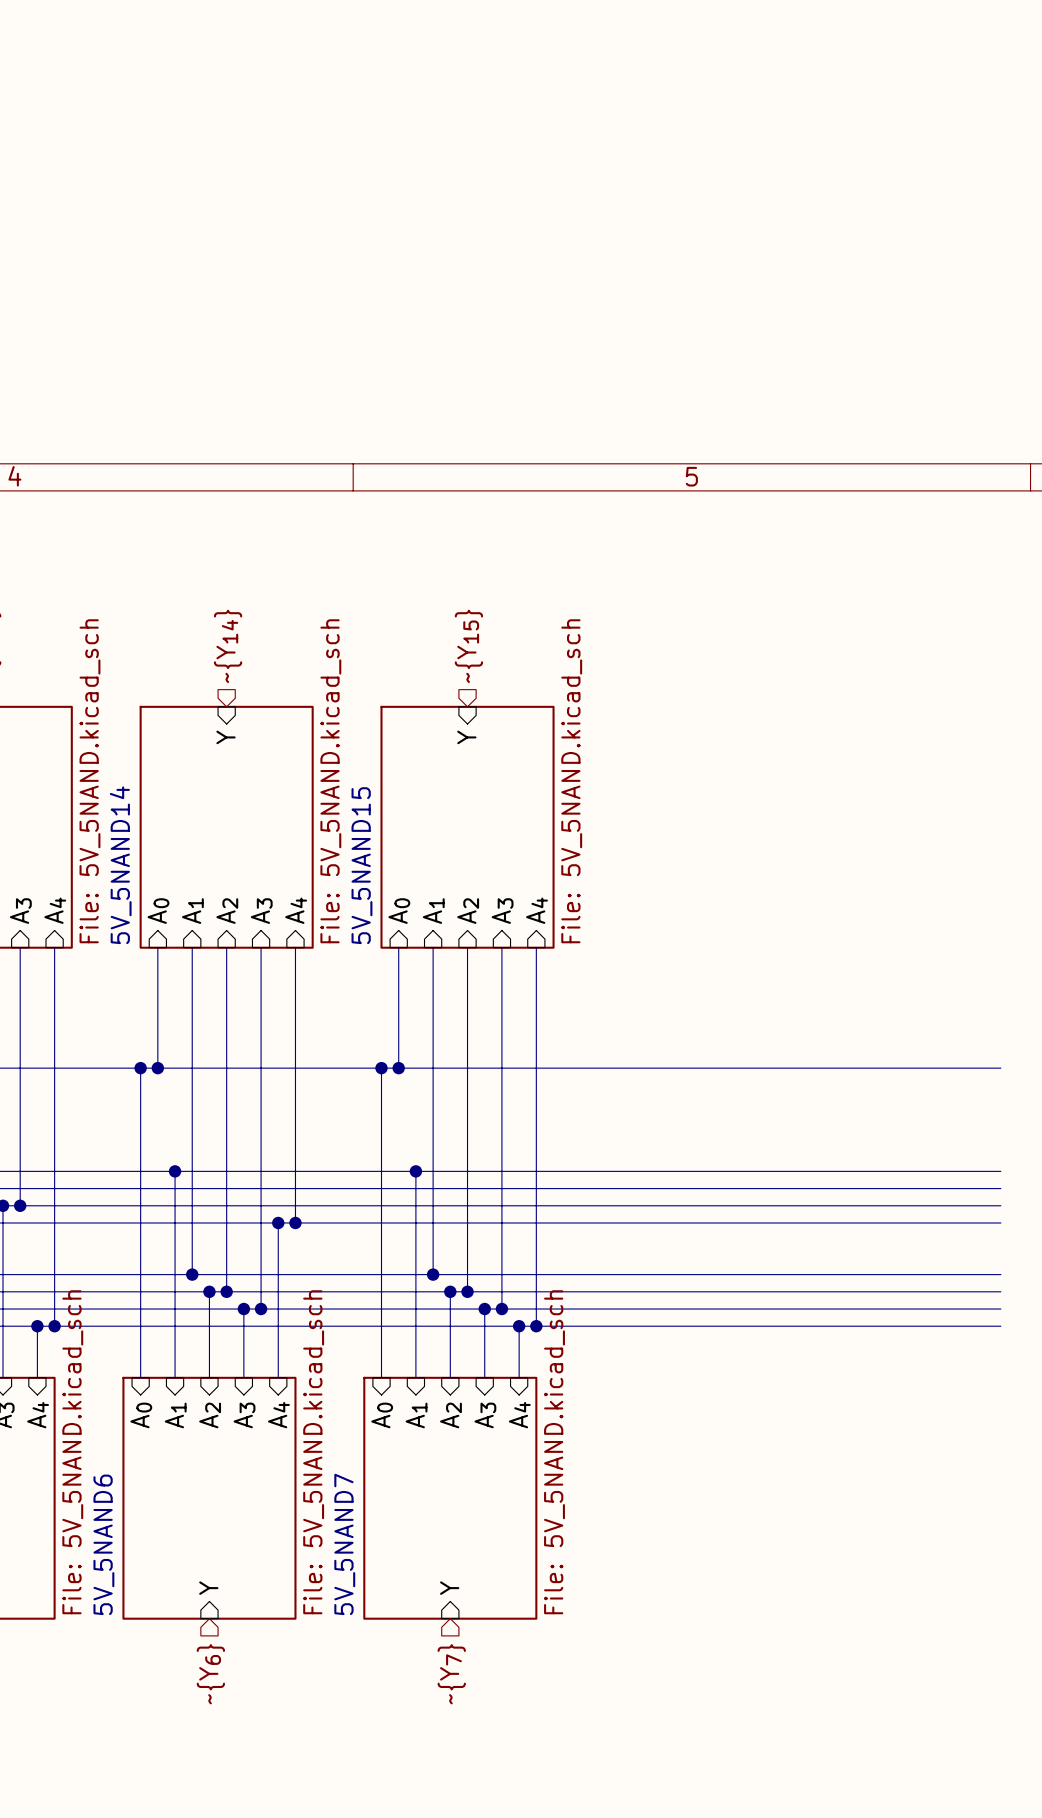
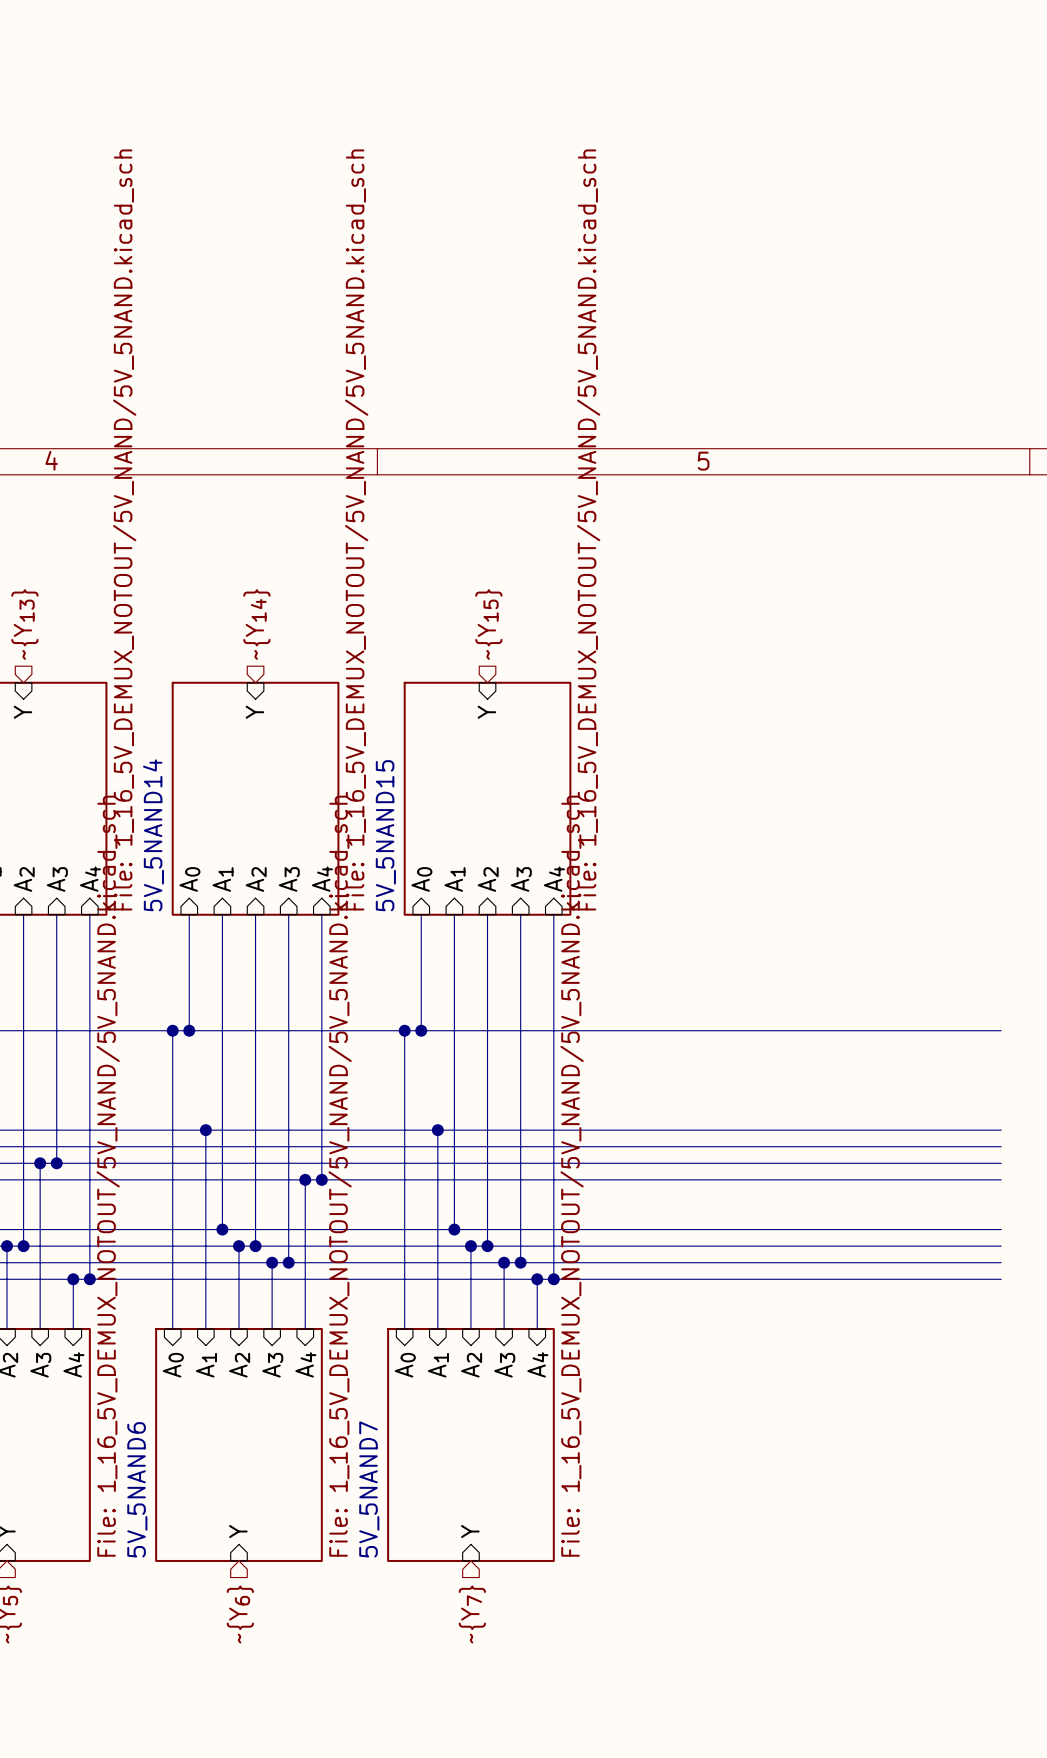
sheet value: File: 5V_5NAND.kicad_sch (89, 781) -> File: 1_16_5V_DEMUX_NOTOUT/5V_NAND/5V_5NAND.kicad_sch (124, 529)
sheet 5V_5NAND14 value: File: 5V_5NAND.kicad_sch (330, 781) -> File: 1_16_5V_DEMUX_NOTOUT/5V_NAND/5V_5NAND.kicad_sch (356, 529)
sheet 5V_5NAND15 value: File: 5V_5NAND.kicad_sch (571, 781) -> File: 1_16_5V_DEMUX_NOTOUT/5V_NAND/5V_5NAND.kicad_sch (588, 529)
sheet value: File: 5V_5NAND.kicad_sch (72, 1452) -> File: 1_16_5V_DEMUX_NOTOUT/5V_NAND/5V_5NAND.kicad_sch (108, 1176)
sheet 5V_5NAND6 value: File: 5V_5NAND.kicad_sch (313, 1452) -> File: 1_16_5V_DEMUX_NOTOUT/5V_NAND/5V_5NAND.kicad_sch (340, 1176)
sheet 5V_5NAND7 value: File: 5V_5NAND.kicad_sch (554, 1452) -> File: 1_16_5V_DEMUX_NOTOUT/5V_NAND/5V_5NAND.kicad_sch (572, 1176)

